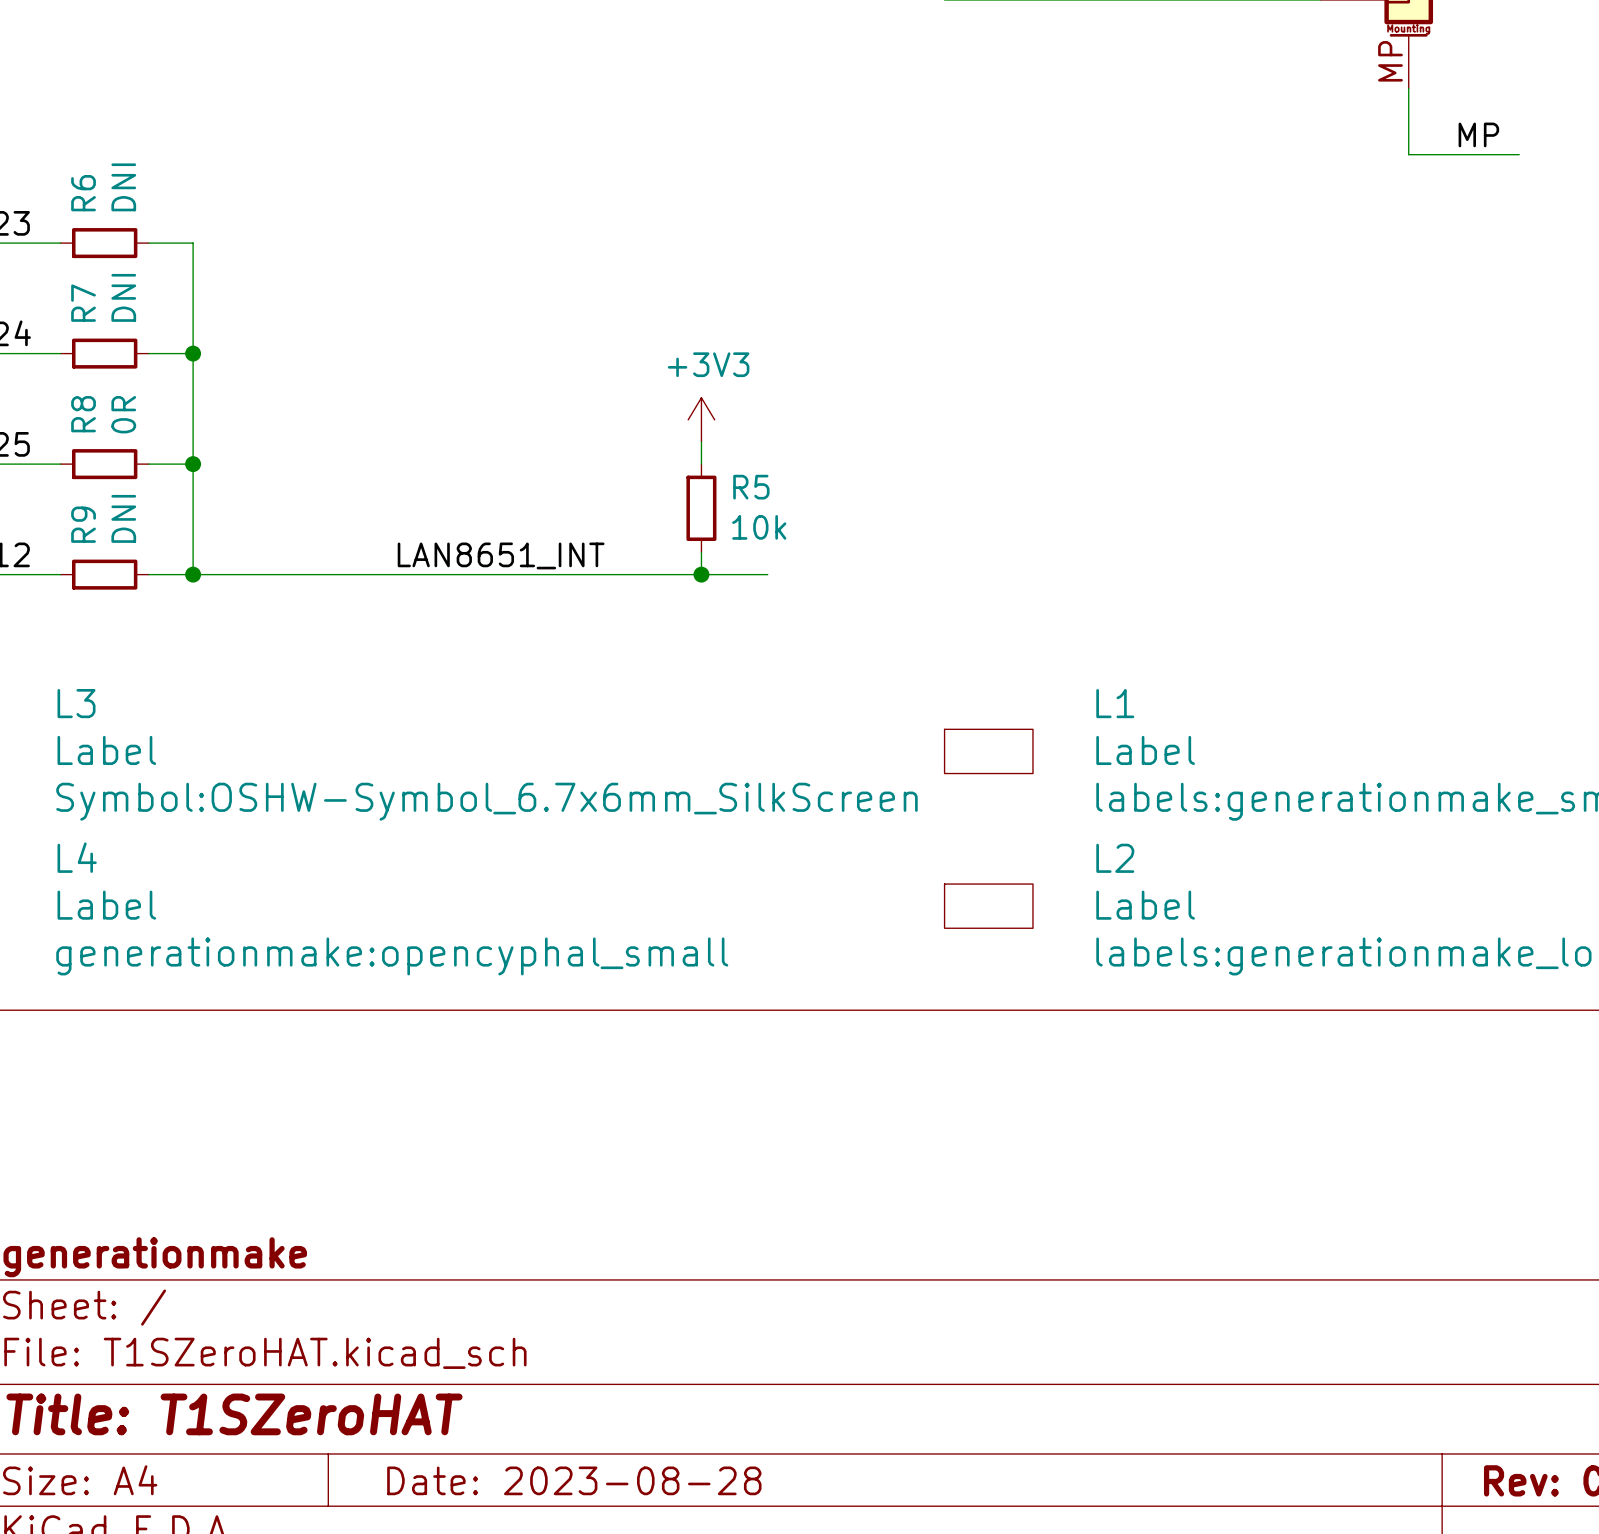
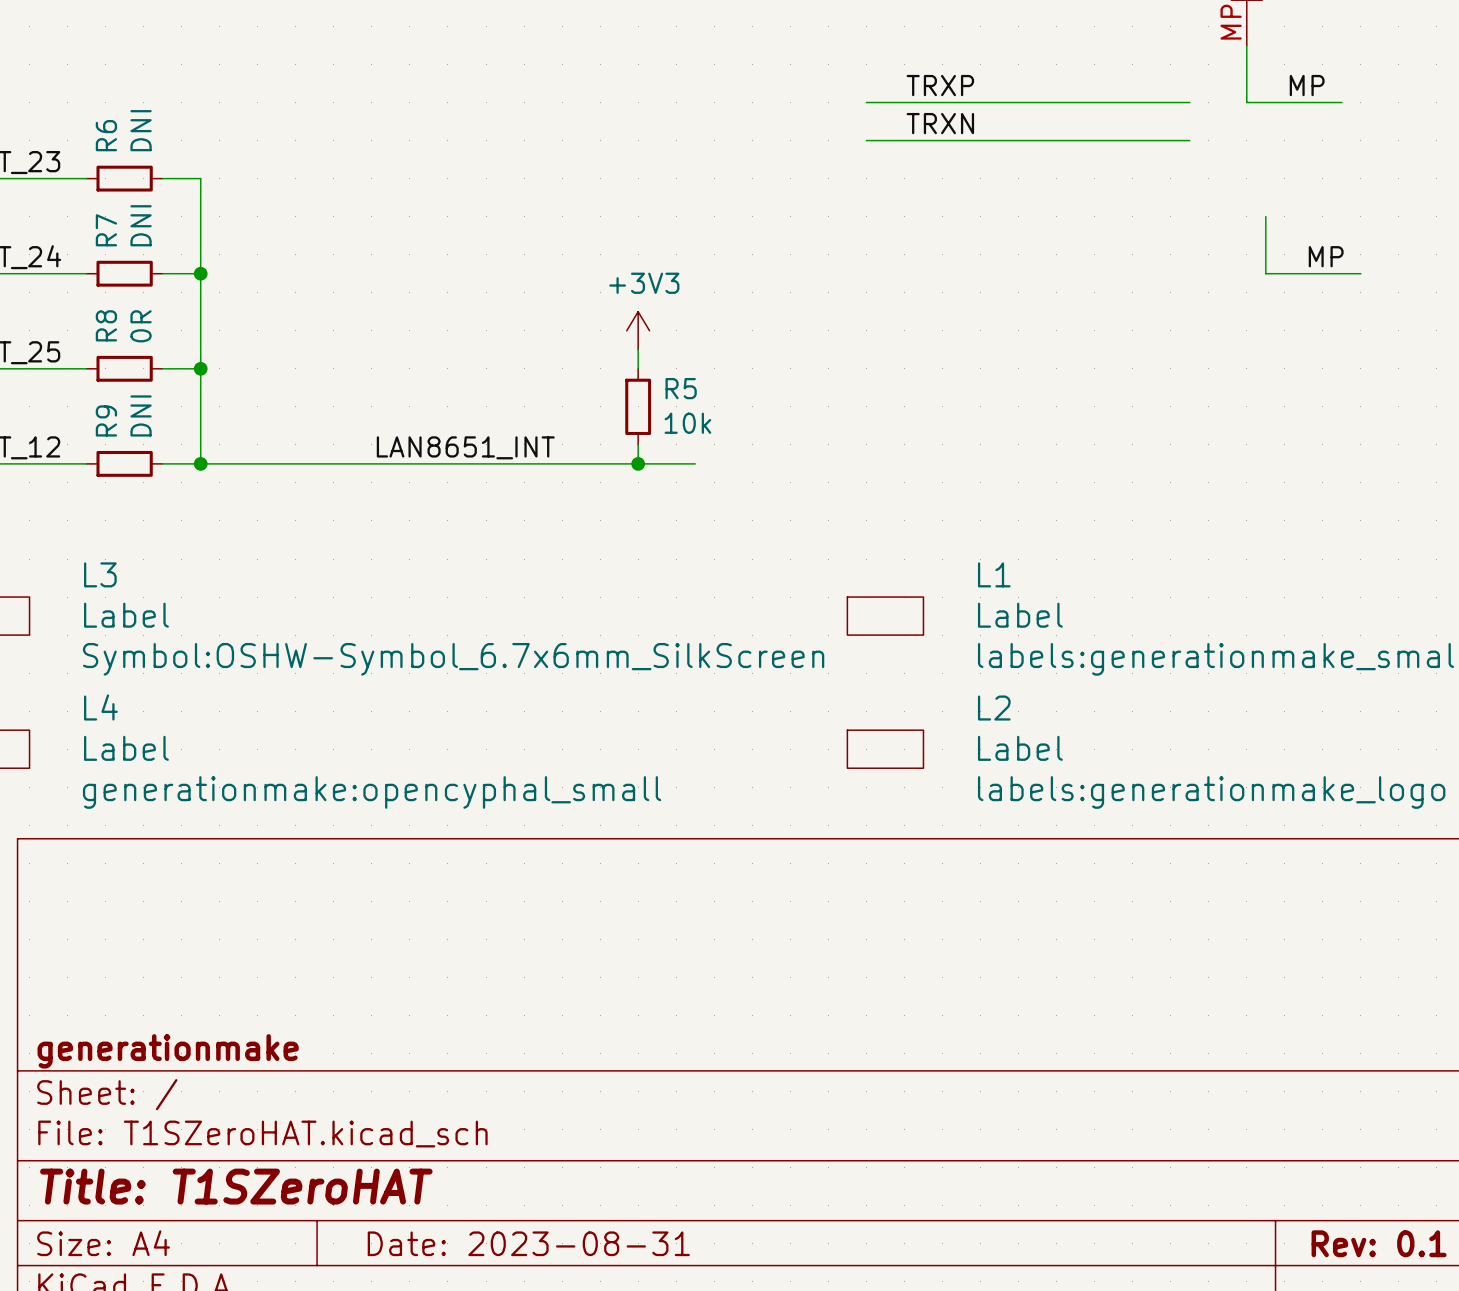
label: none -> TRXP (940, 85)
wire: none -> (866, 102) (1189, 102)
label: none -> TRXN (940, 123)
wire: none -> (866, 140) (1189, 140)
wire: none -> (1265, 216) (1265, 273) (1360, 273)
label: none -> MP (1326, 256)
title block: Date: 2023-08-28 (574, 1480) -> Date: 2023-08-31 (528, 1243)

